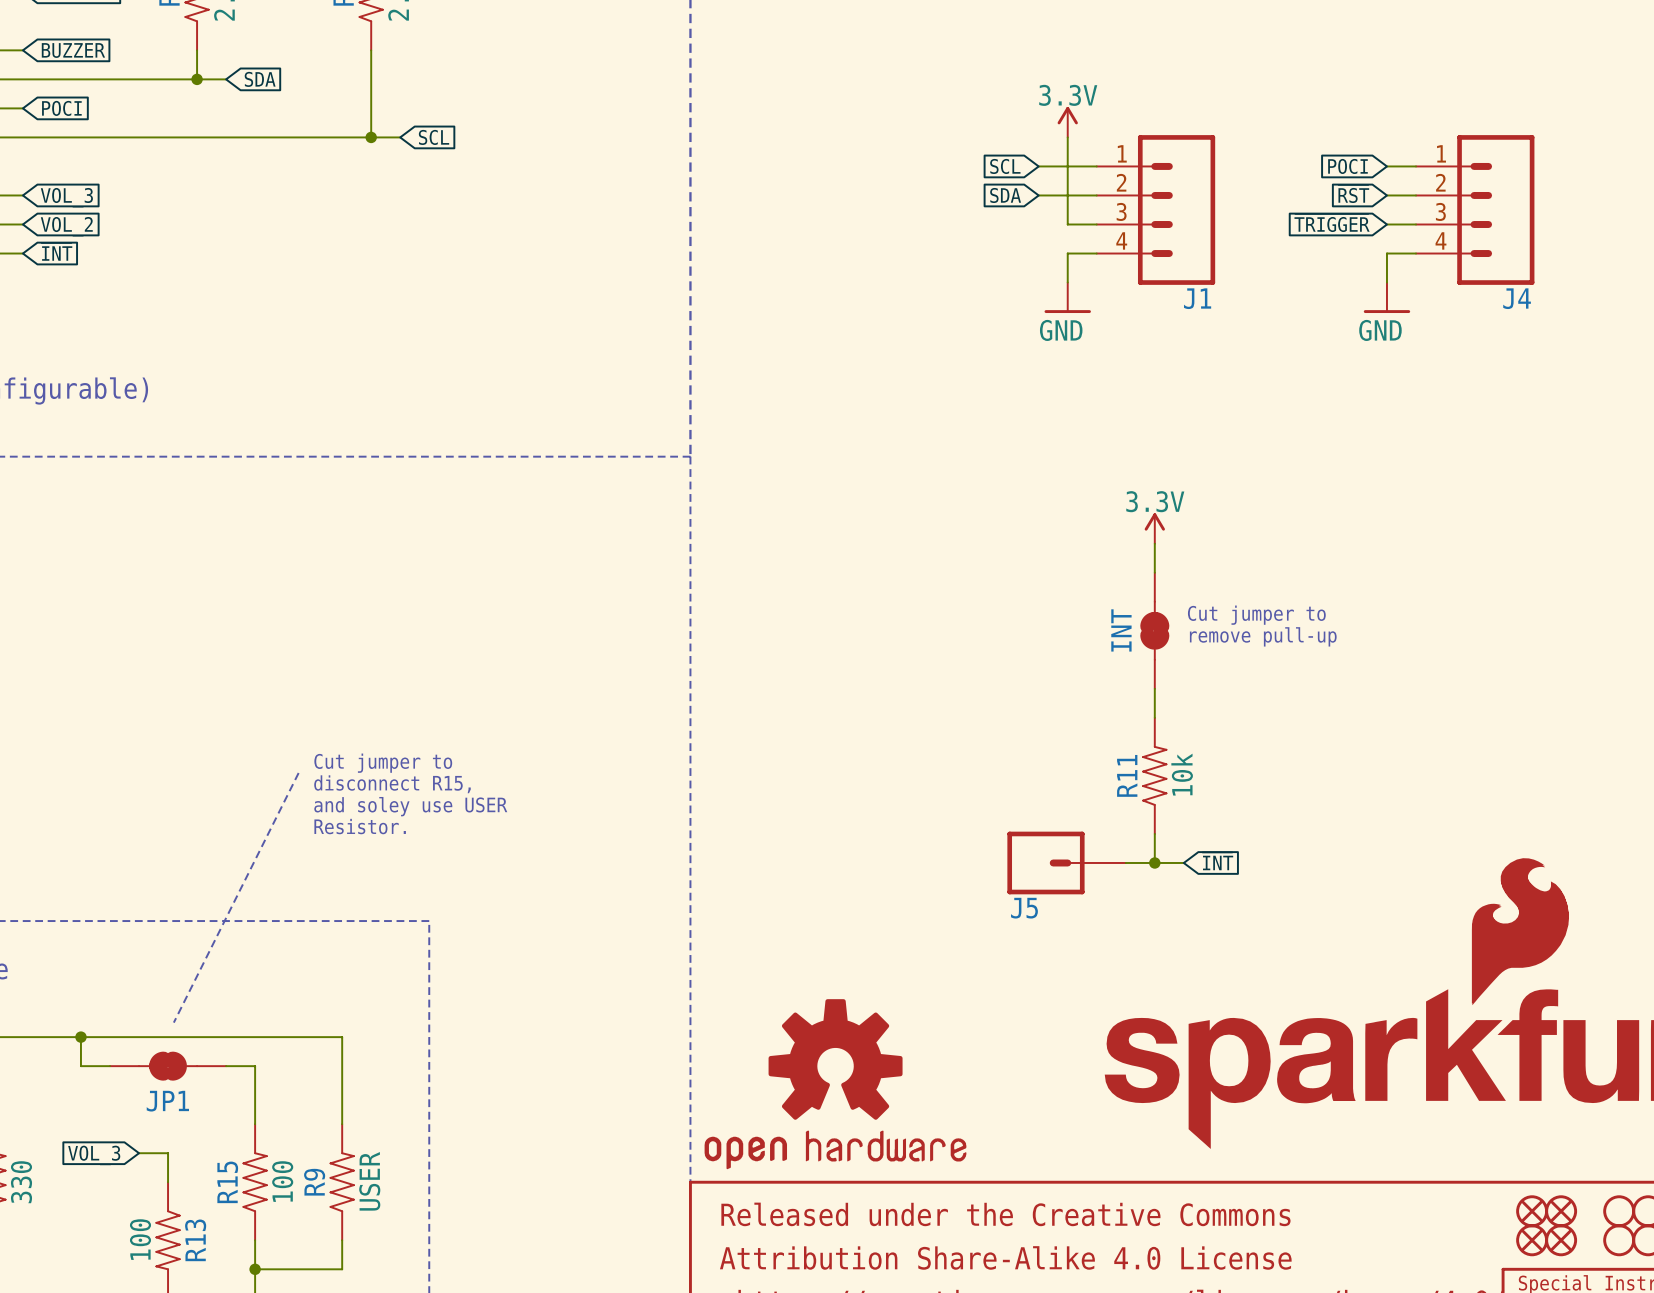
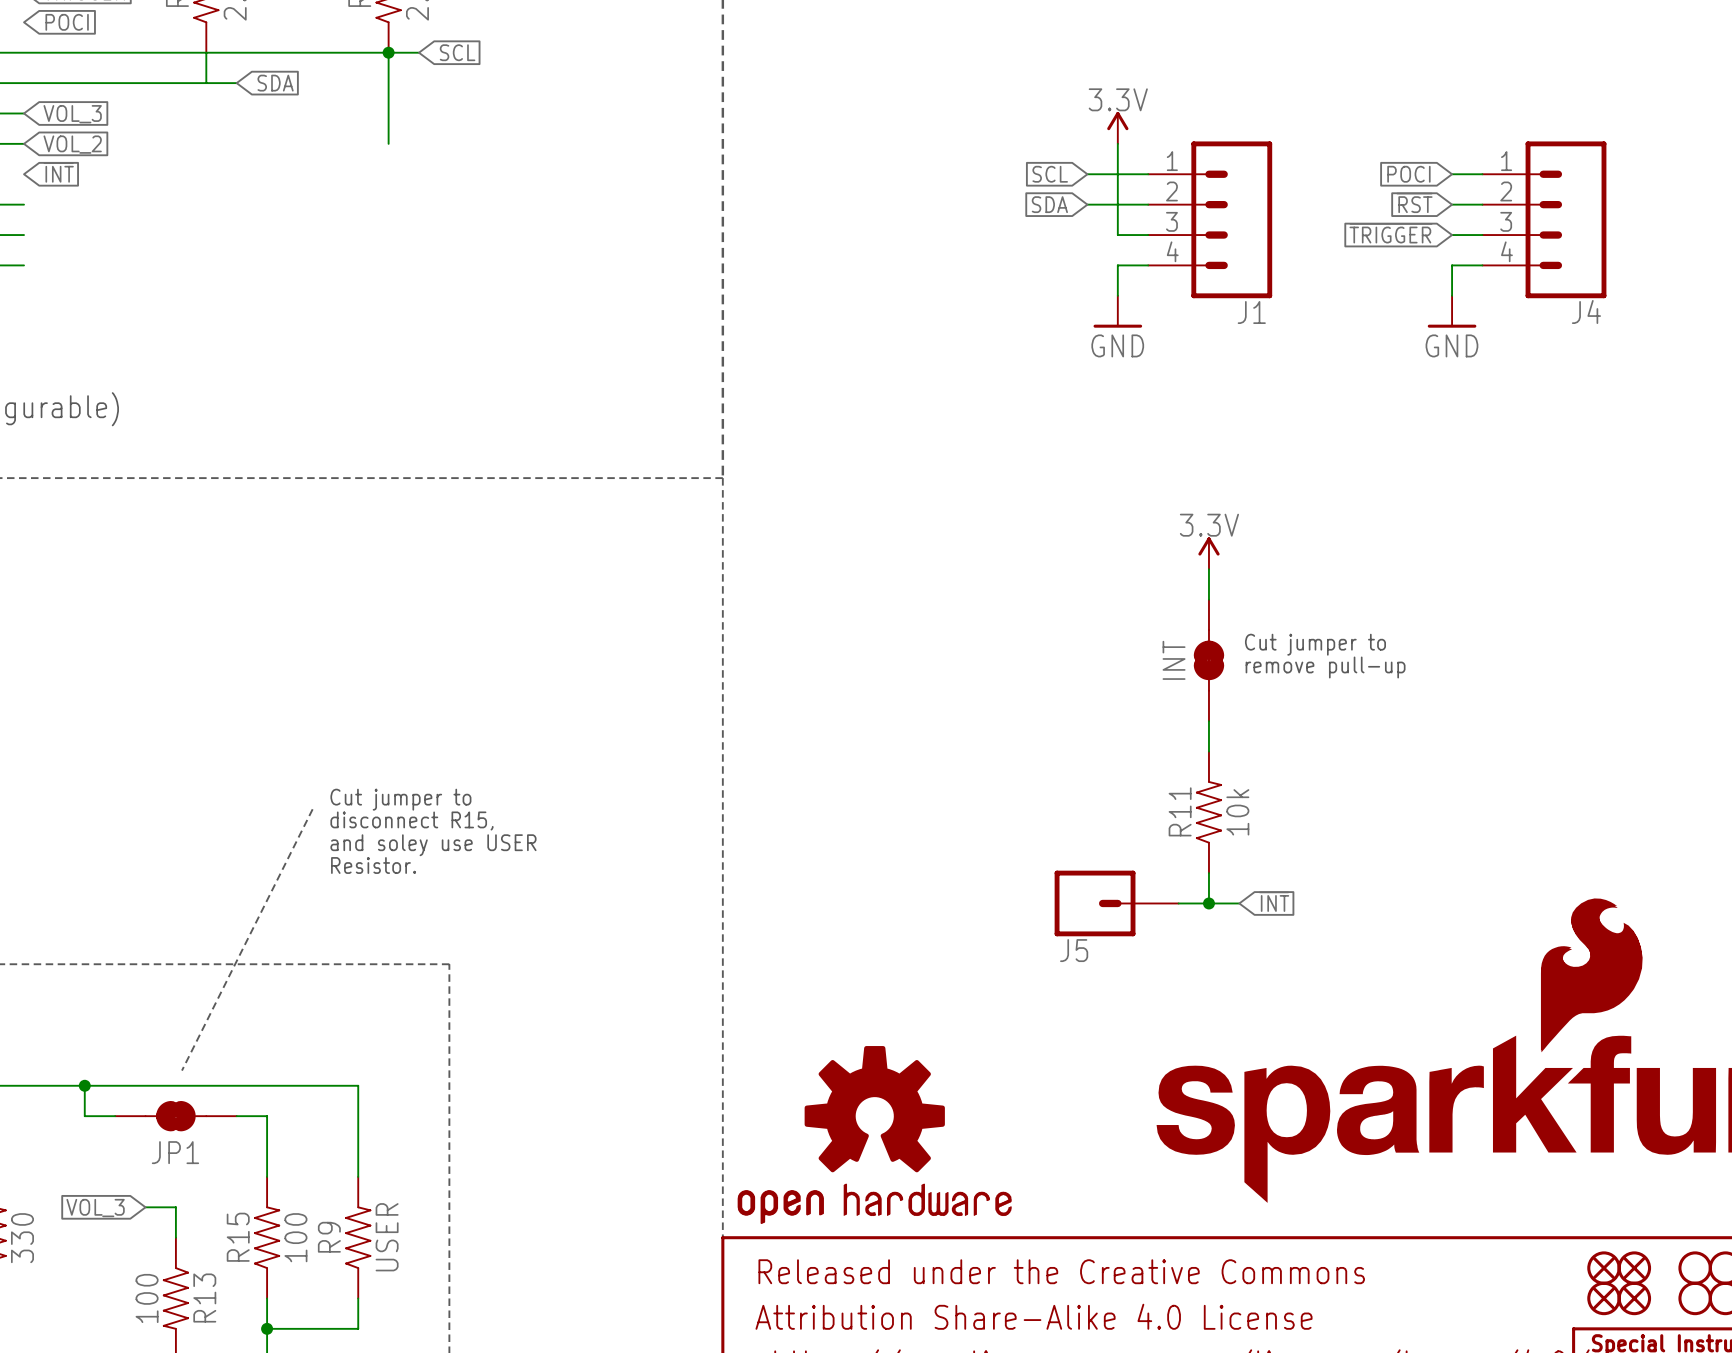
global label: none -> POCI (67, 22)
global label: BUZZER (73, 50) -> none
junction: none -> (388, 52)
junction: (197, 79) -> none
global label: POCI (61, 108) -> VOL_3 (72, 114)
wire: (22, 137) (400, 137) -> (24, 52) (419, 52)
junction: (371, 137) -> none
global label position: SCL (434, 137) -> SCL (457, 52)
global label: VOL_3 (66, 197) -> none
global label position: VOL_2 (66, 226) -> VOL_2 (72, 144)
global label position: ~{INT} (56, 251) -> ~{INT} (58, 172)

